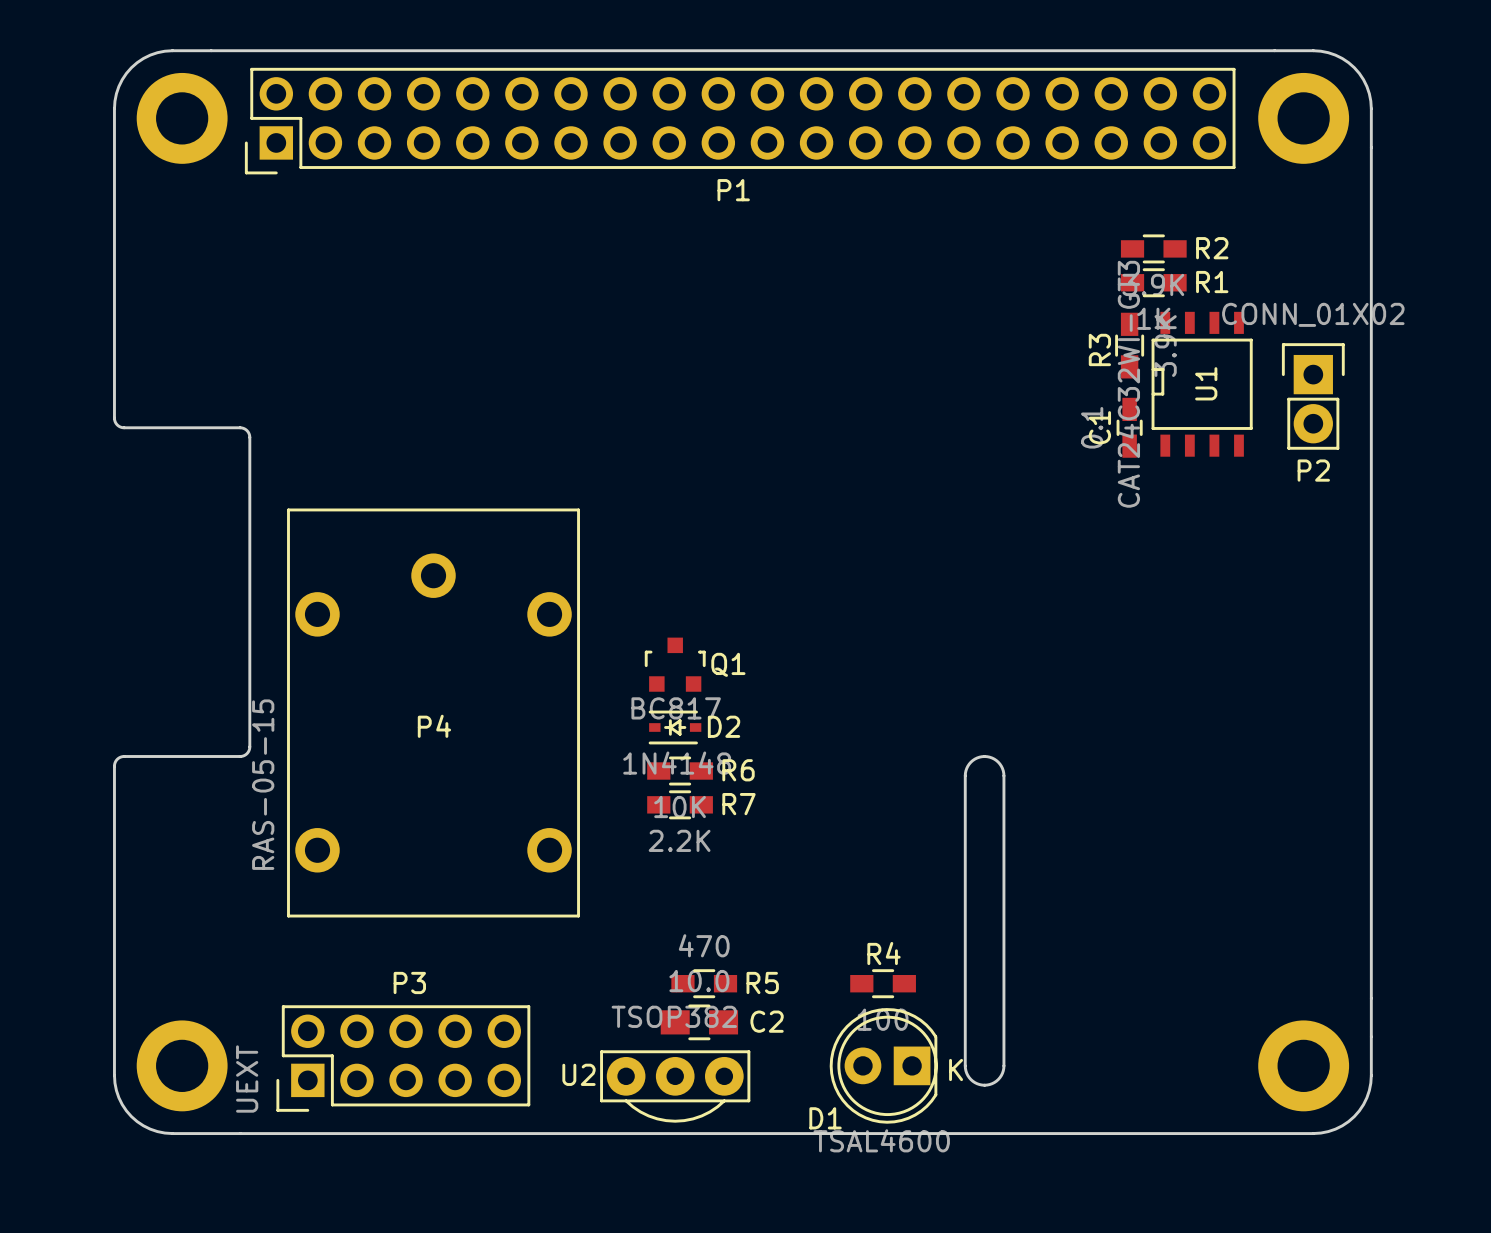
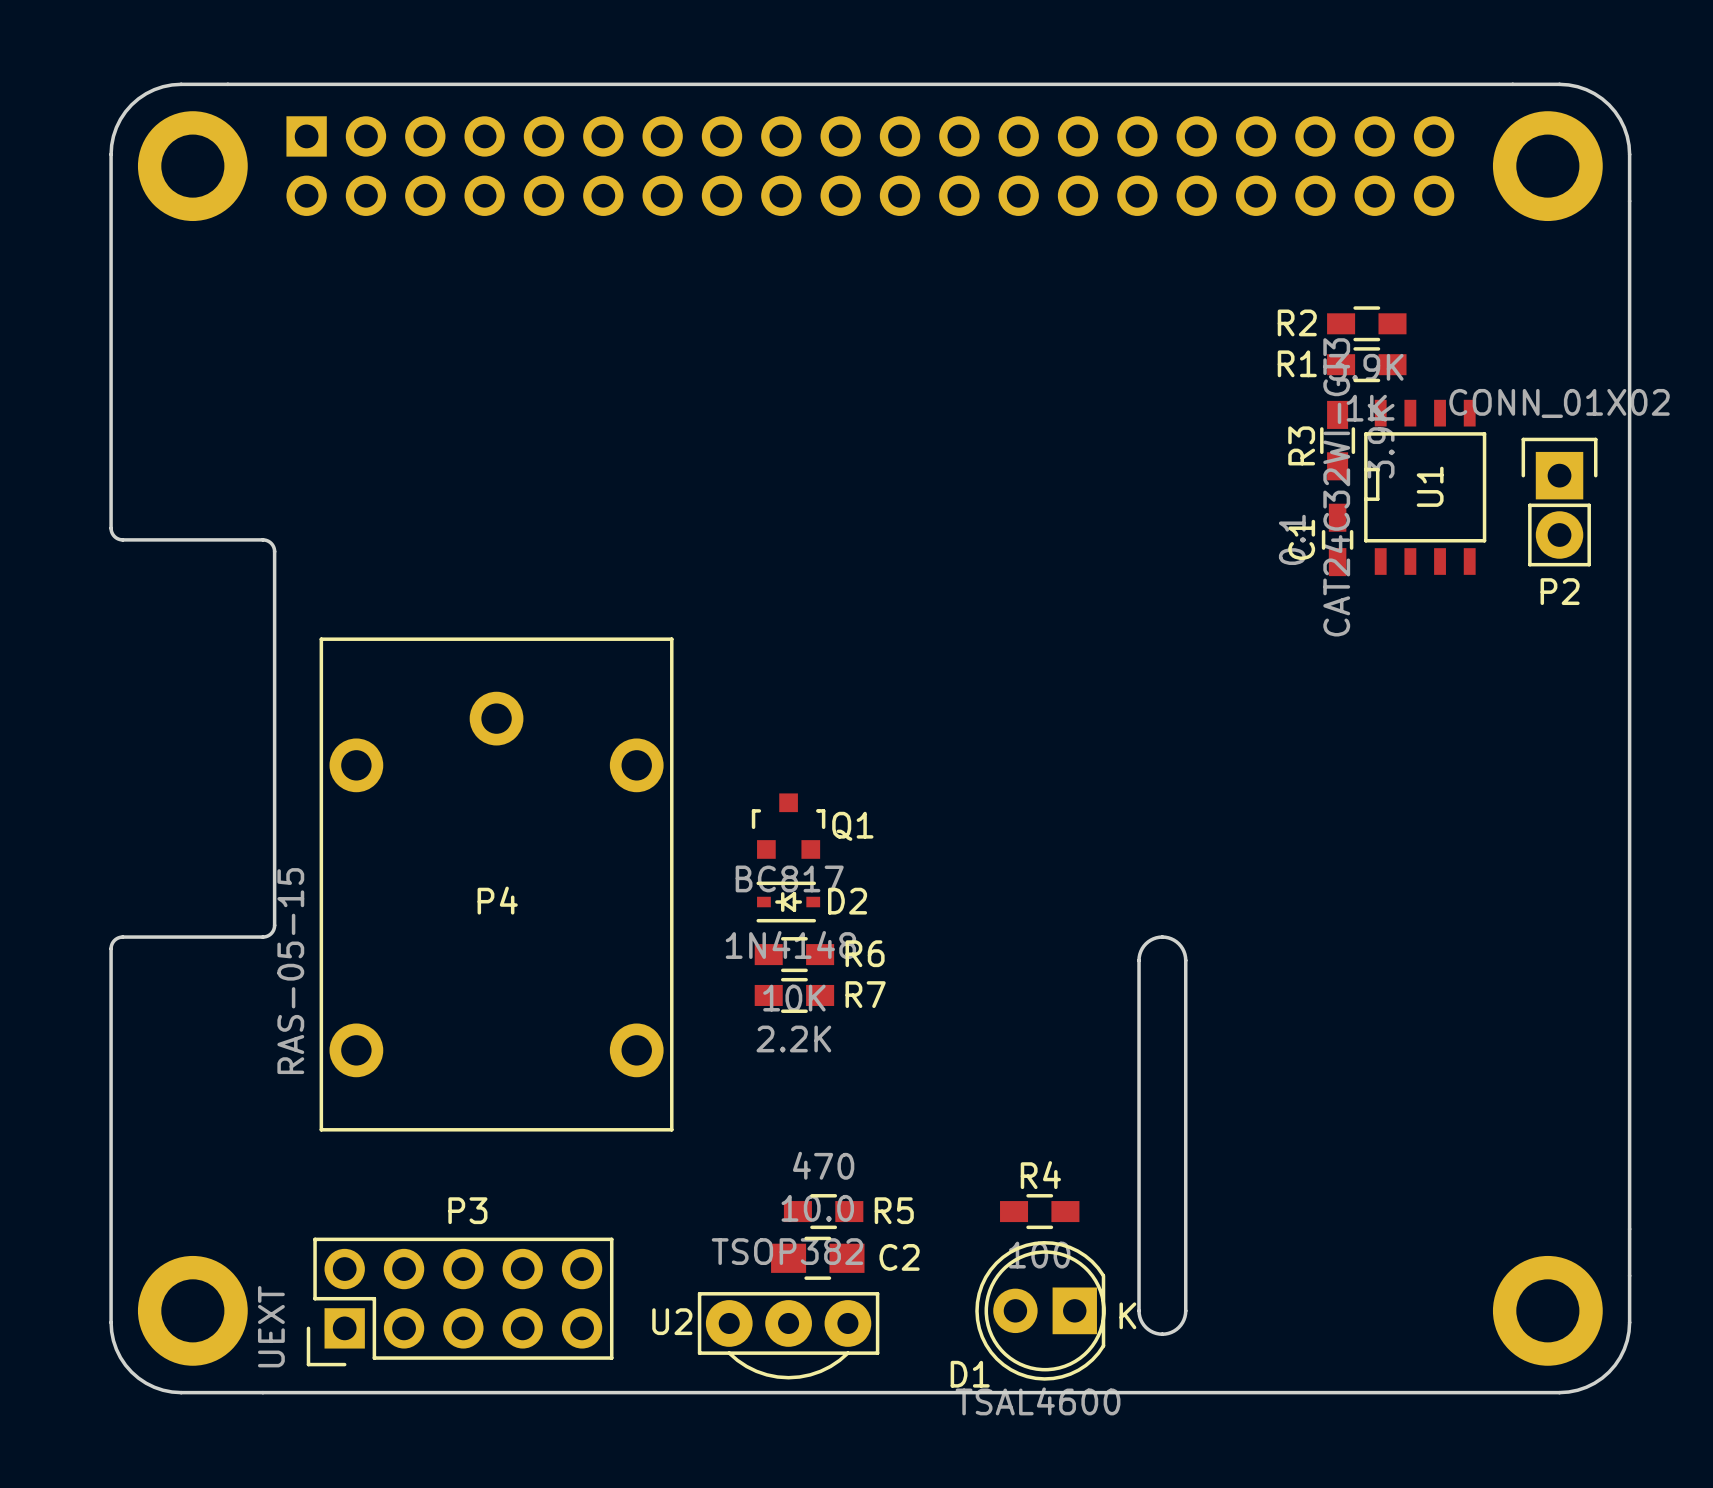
P1 side: top (740, 121) -> bottom (870, 166)
R2 name position: R2 (1212, 248) -> R2 (1297, 322)
R1 name position: R1 (1212, 282) -> R1 (1297, 363)

